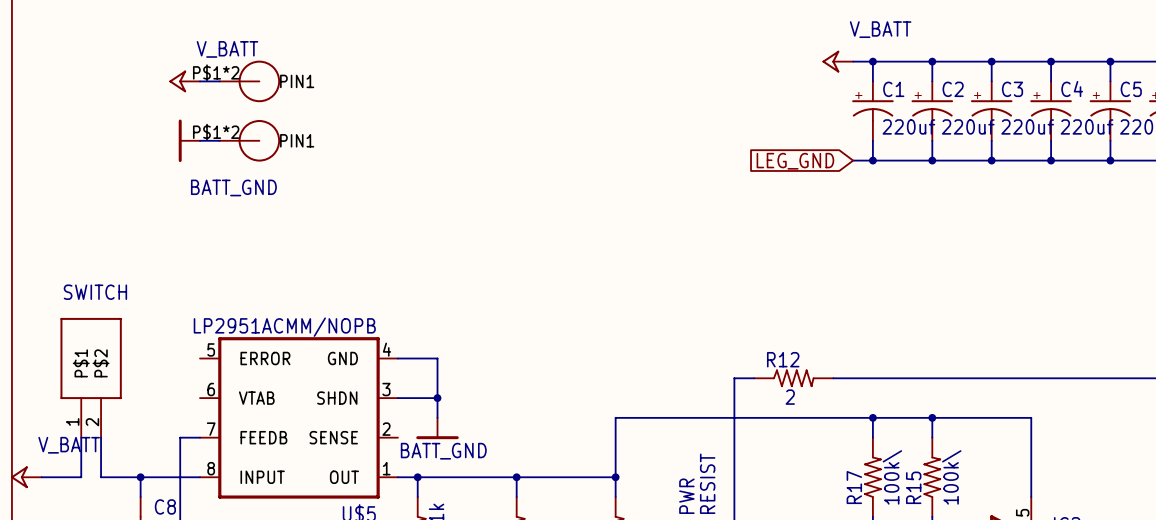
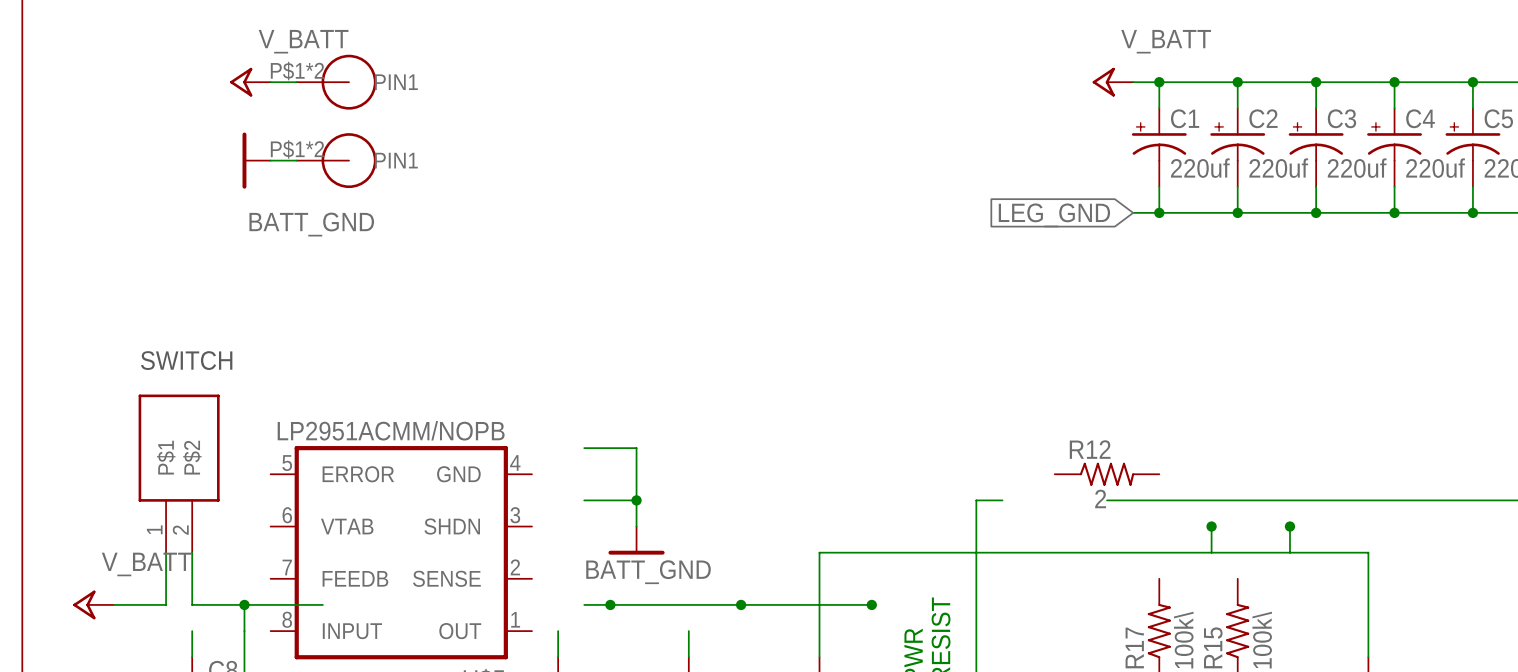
part: none -> (336, 82)
power symbol position: V_BATT (184, 81) -> V_BATT (250, 82)
wire: (200, 81) (219, 81) -> (270, 82) (296, 82)
part: (249, 81) -> none
part: none -> (336, 160)
power symbol position: BATT_GND (189, 140) -> BATT_GND (256, 160)
wire: (200, 140) (219, 140) -> (270, 160) (296, 160)
part: (249, 140) -> none
text position: SWITCH (95, 292) -> SWITCH (186, 360)
wire: (397, 358) (437, 358) (437, 417) -> (584, 448) (636, 448) (636, 526)
part position: (91, 377) -> (179, 473)
junction: none -> (636, 500)
R12 position: (793, 378) -> (1107, 474)
wire: (397, 398) (437, 398) -> (584, 500) (636, 500)
junction: (437, 398) -> none
junction: none -> (1211, 526)
junction: none -> (1289, 526)
wire: (872, 417) (872, 437) -> (1211, 526) (1211, 552)
junction: (872, 417) -> none
wire: (932, 417) (932, 437) -> (1289, 526) (1289, 552)
junction: (932, 417) -> none
power symbol position: BATT_GND (437, 428) -> BATT_GND (636, 540)
wire: (81, 437) (81, 477) (41, 477) -> (166, 552) (166, 604) (113, 604)
wire: (101, 437) (101, 477) (200, 477) -> (192, 552) (192, 604) (322, 604)
wire: (200, 437) (180, 437) (180, 457) -> none
junction: none -> (610, 604)
junction: none -> (741, 604)
junction: none -> (871, 604)
power symbol position: V_BATT (26, 477) -> V_BATT (93, 604)
junction position: (140, 477) -> (244, 604)
wire: (397, 477) (615, 477) -> (584, 604) (871, 604)
junction: (417, 477) -> none
junction: (516, 477) -> none
junction: (615, 477) -> none

